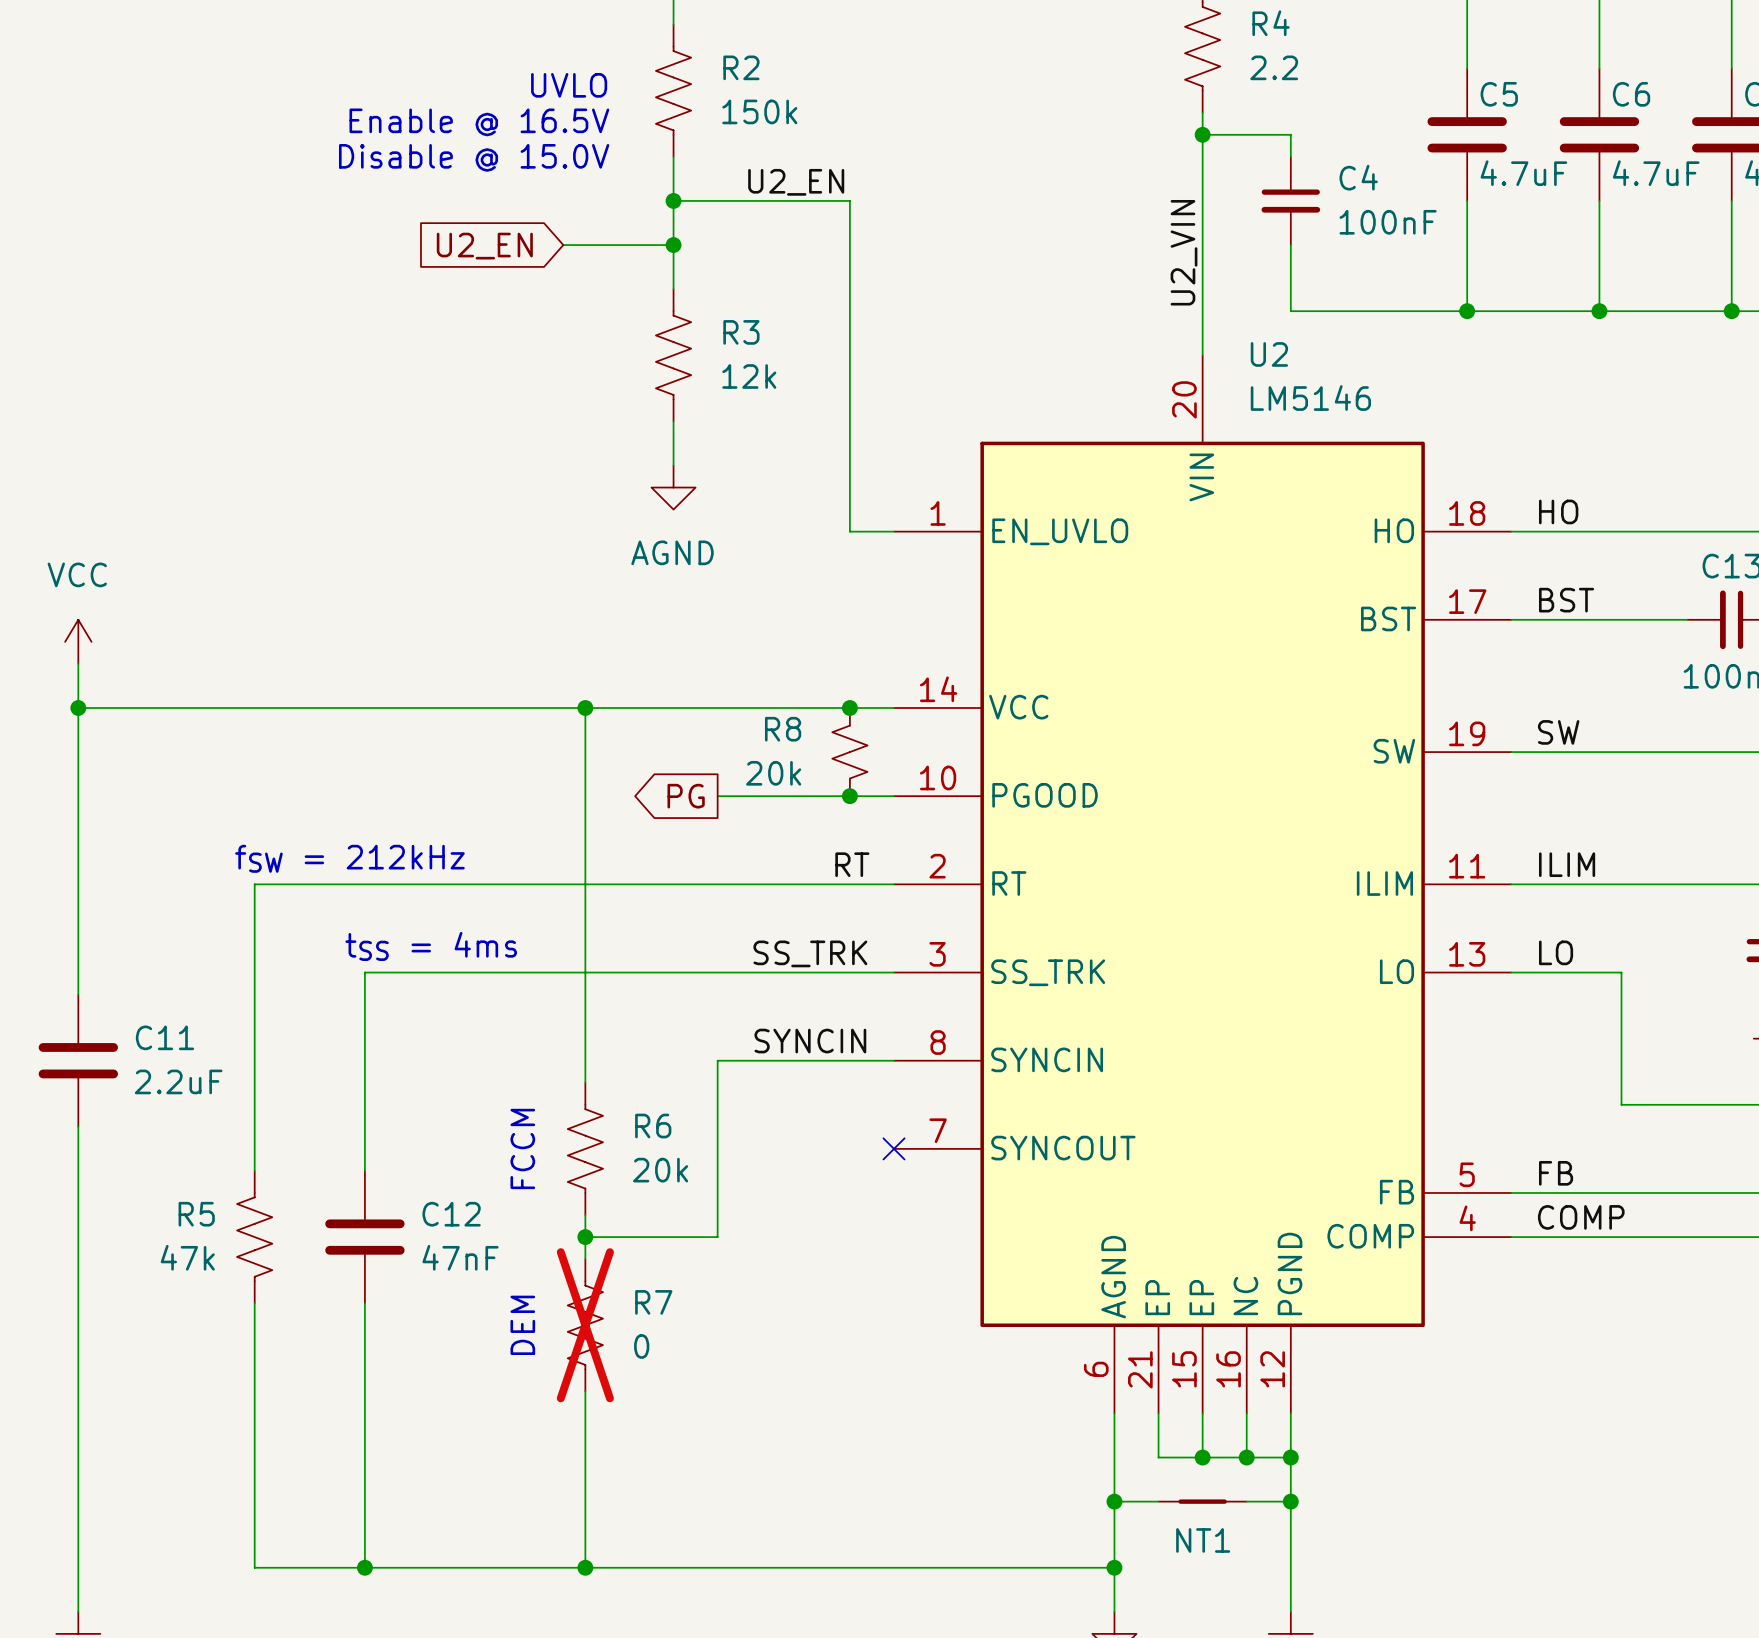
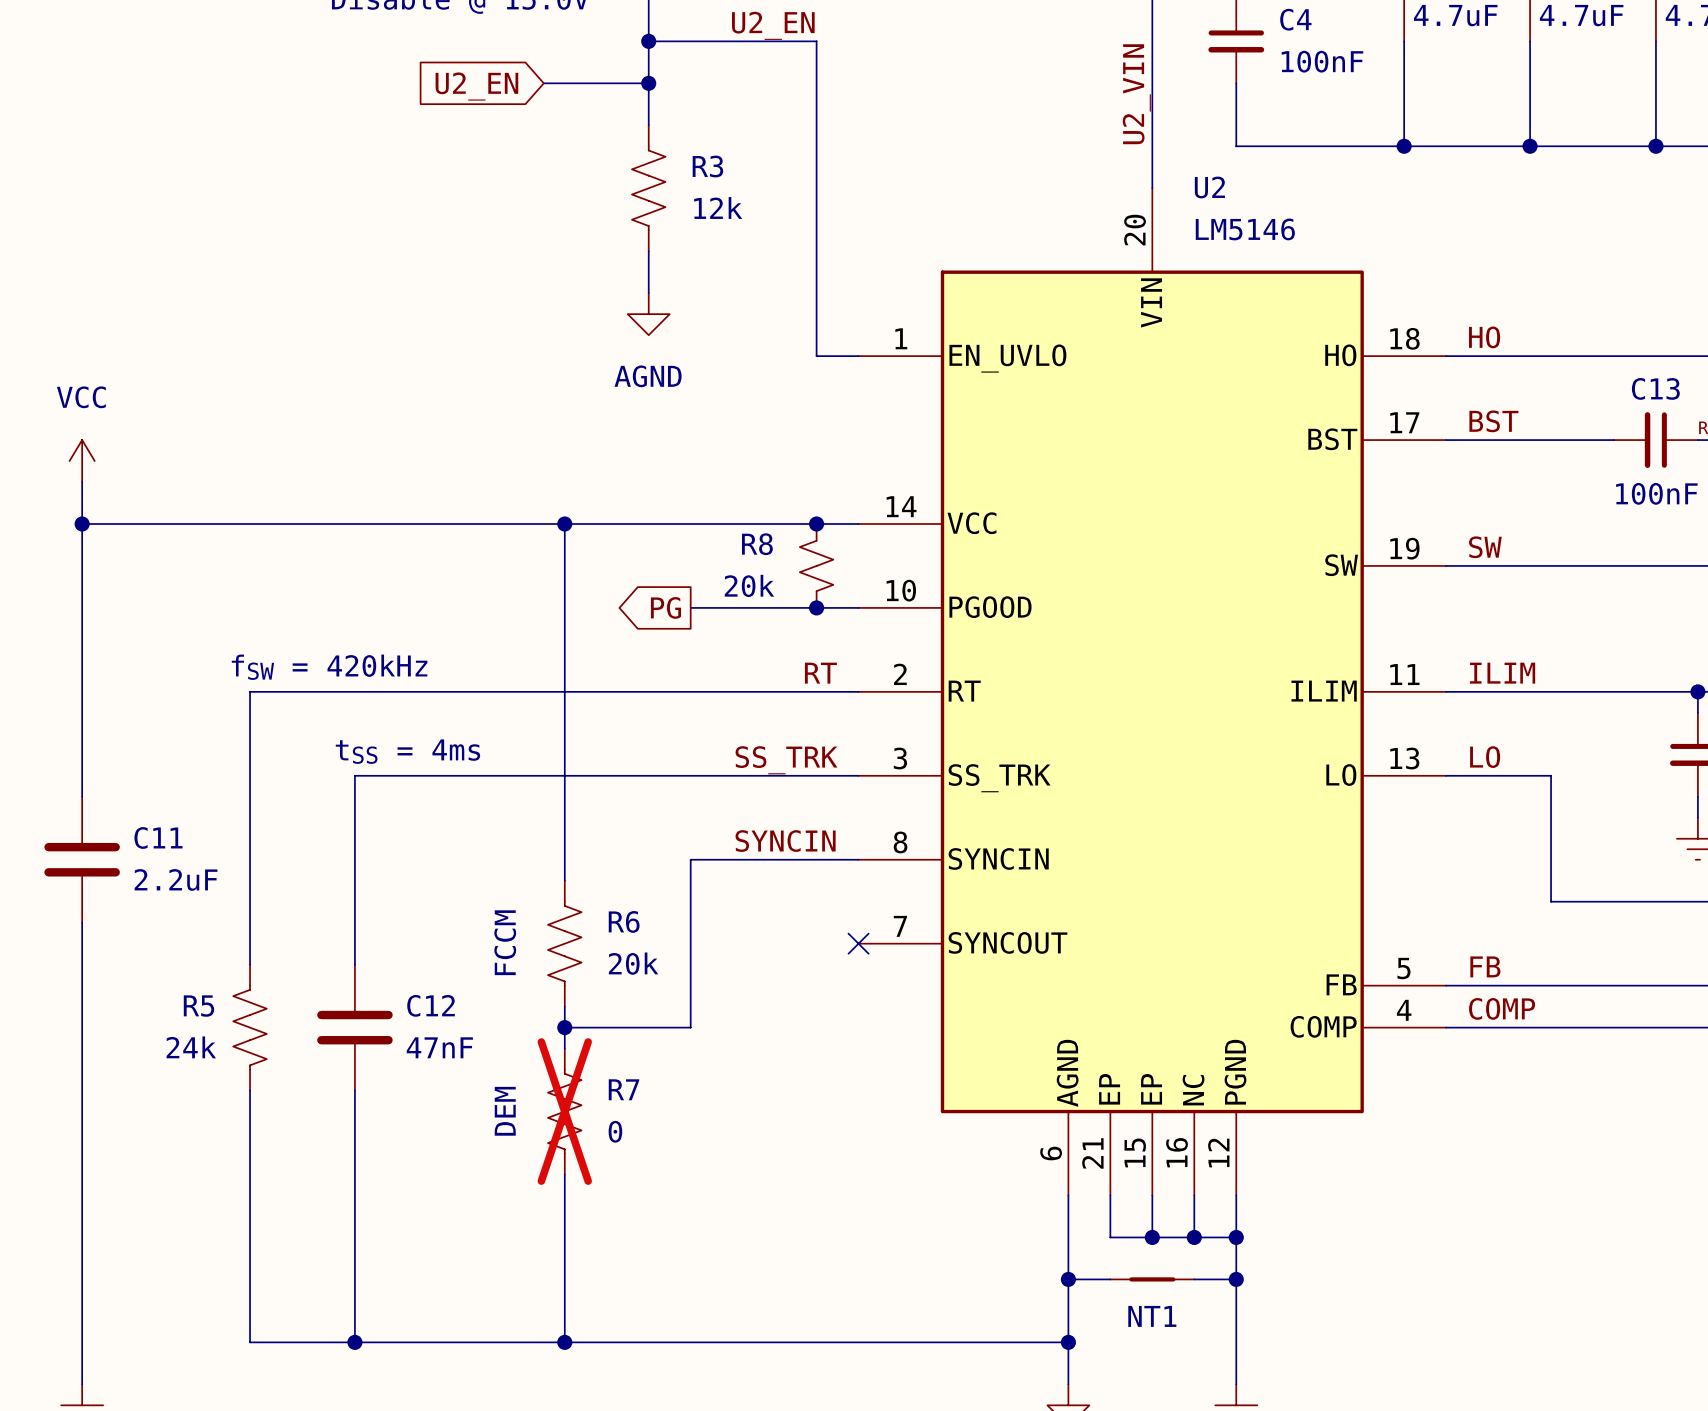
text: fSW = 212kHz (349, 858) -> fSW = 420kHz (329, 667)
R5 value: 47k (187, 1257) -> 24k (191, 1047)

